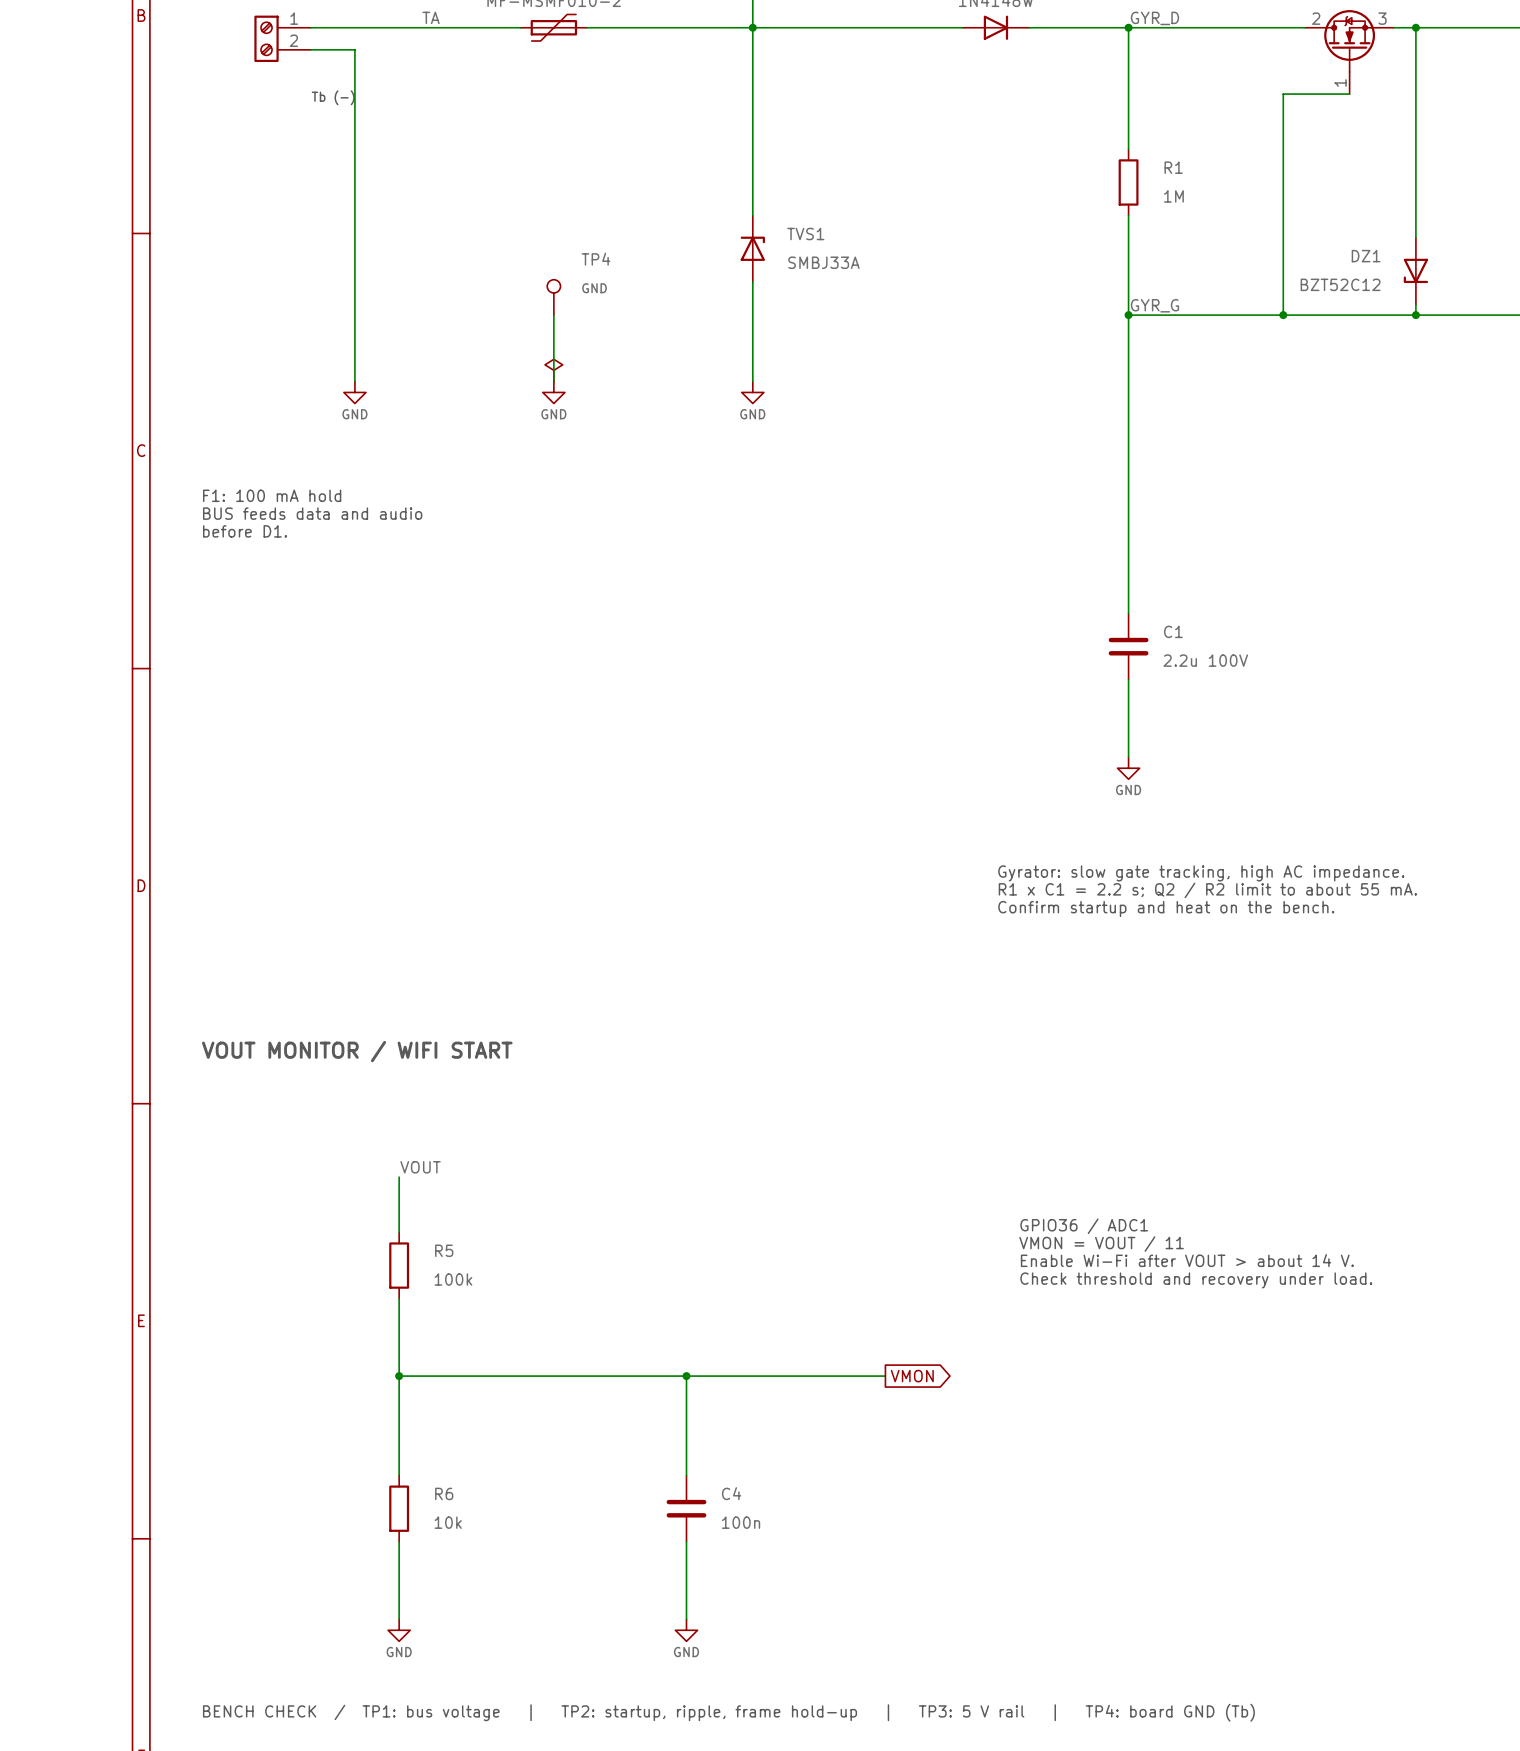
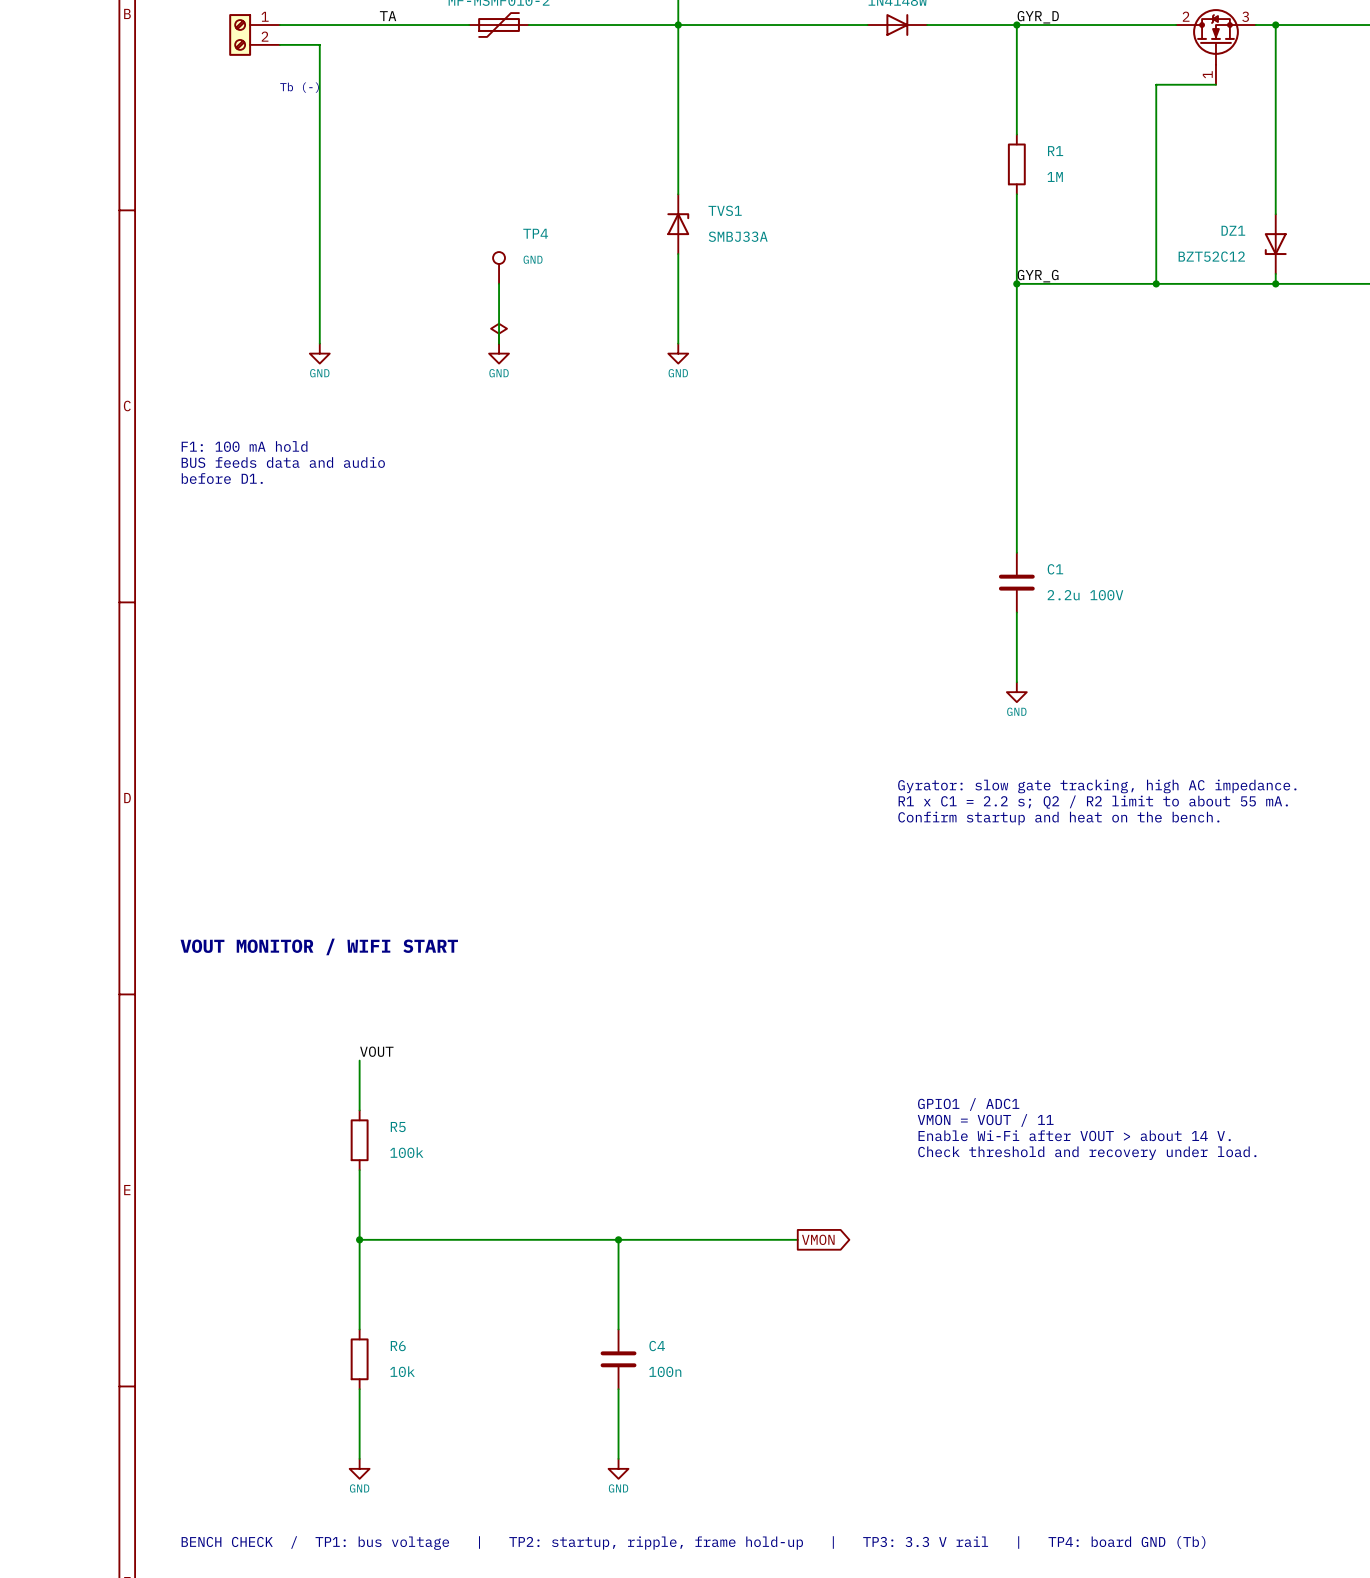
text: GPIO36 / ADC1 (1084, 1226) -> GPIO1 / ADC1 (968, 1104)
text: BENCH CHECK / TP1: bus voltage | TP2: startup, ripple, frame hold-up | TP3: 5 V rail | TP4: board GND (Tb) (728, 1712) -> BENCH CHECK / TP1: bus voltage | TP2: startup, ripple, frame hold-up | TP3: 3.3 V rail | TP4: board GND (Tb) (693, 1543)

